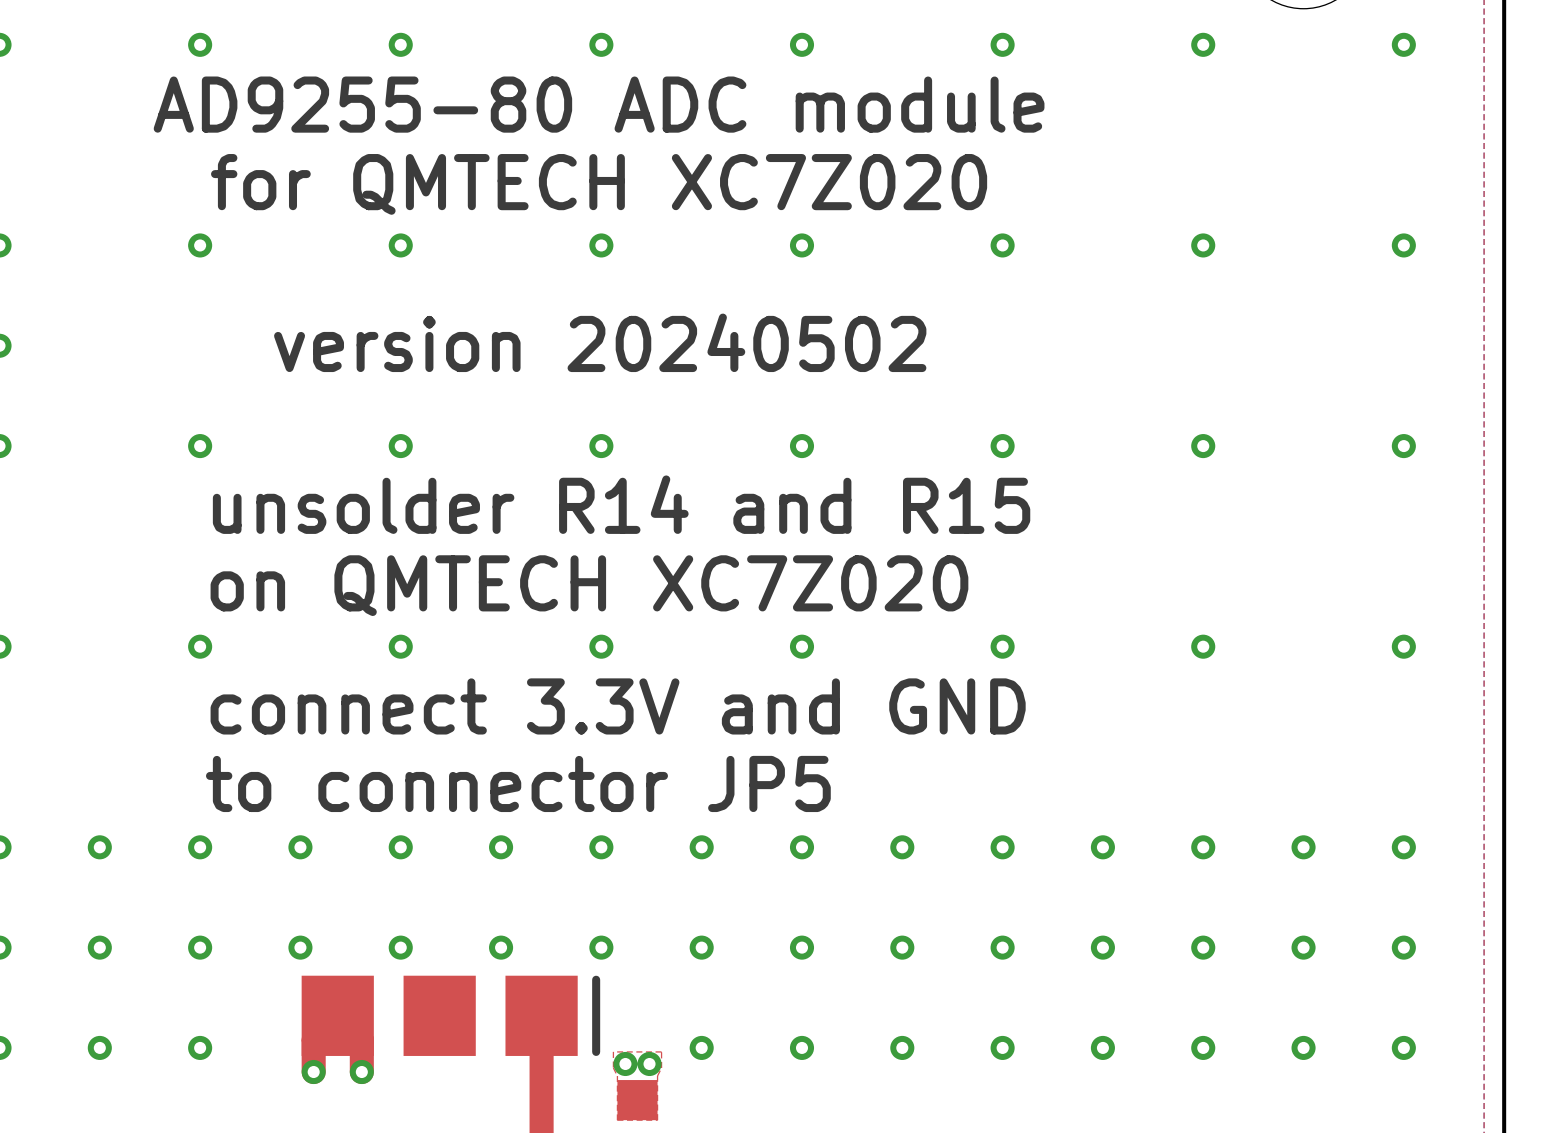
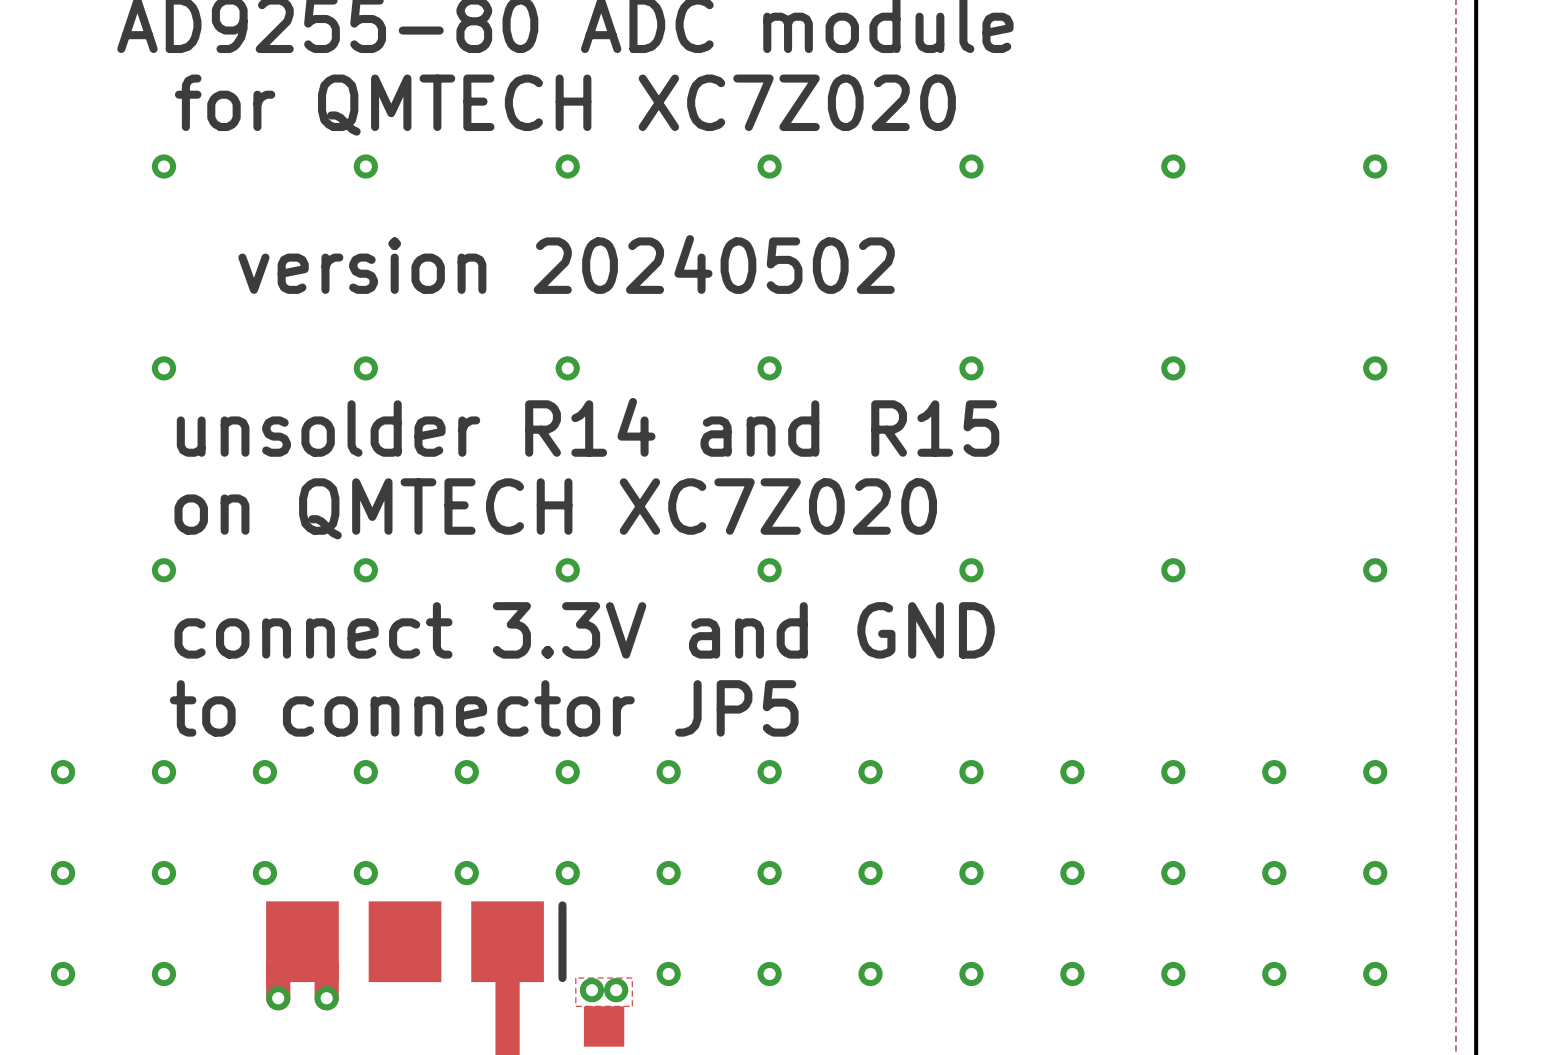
top zone outline: (613, 1051) (613, 1068) (617, 1076) (617, 1120) (657, 1120) (657, 1076) (661, 1068) (661, 1051) -> (579, 978) (575, 978) (575, 1006) (632, 1006) (632, 978) (628, 978)

